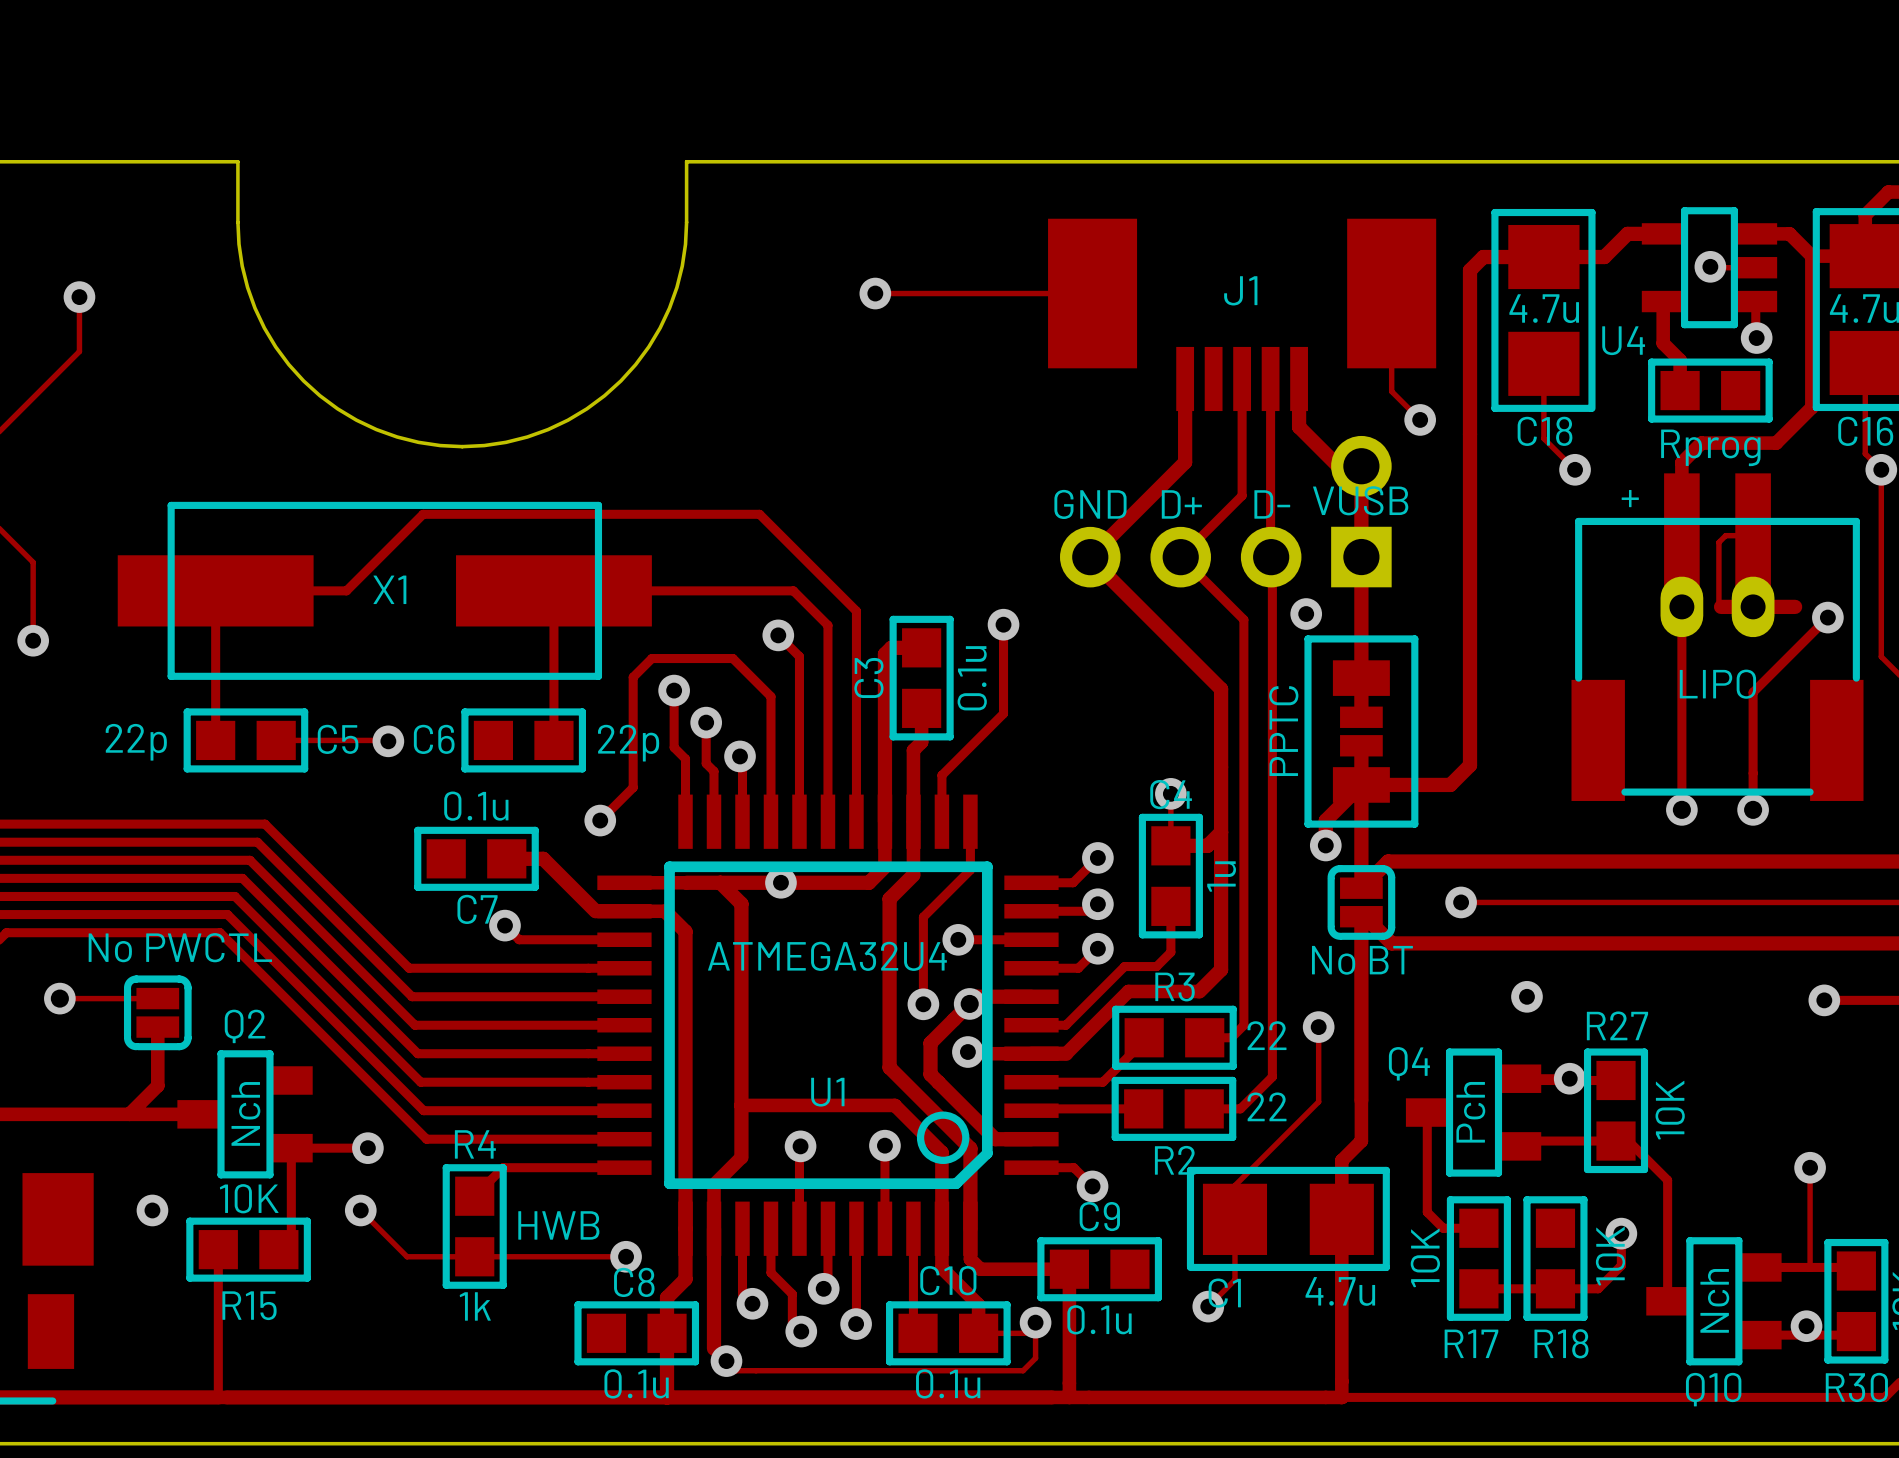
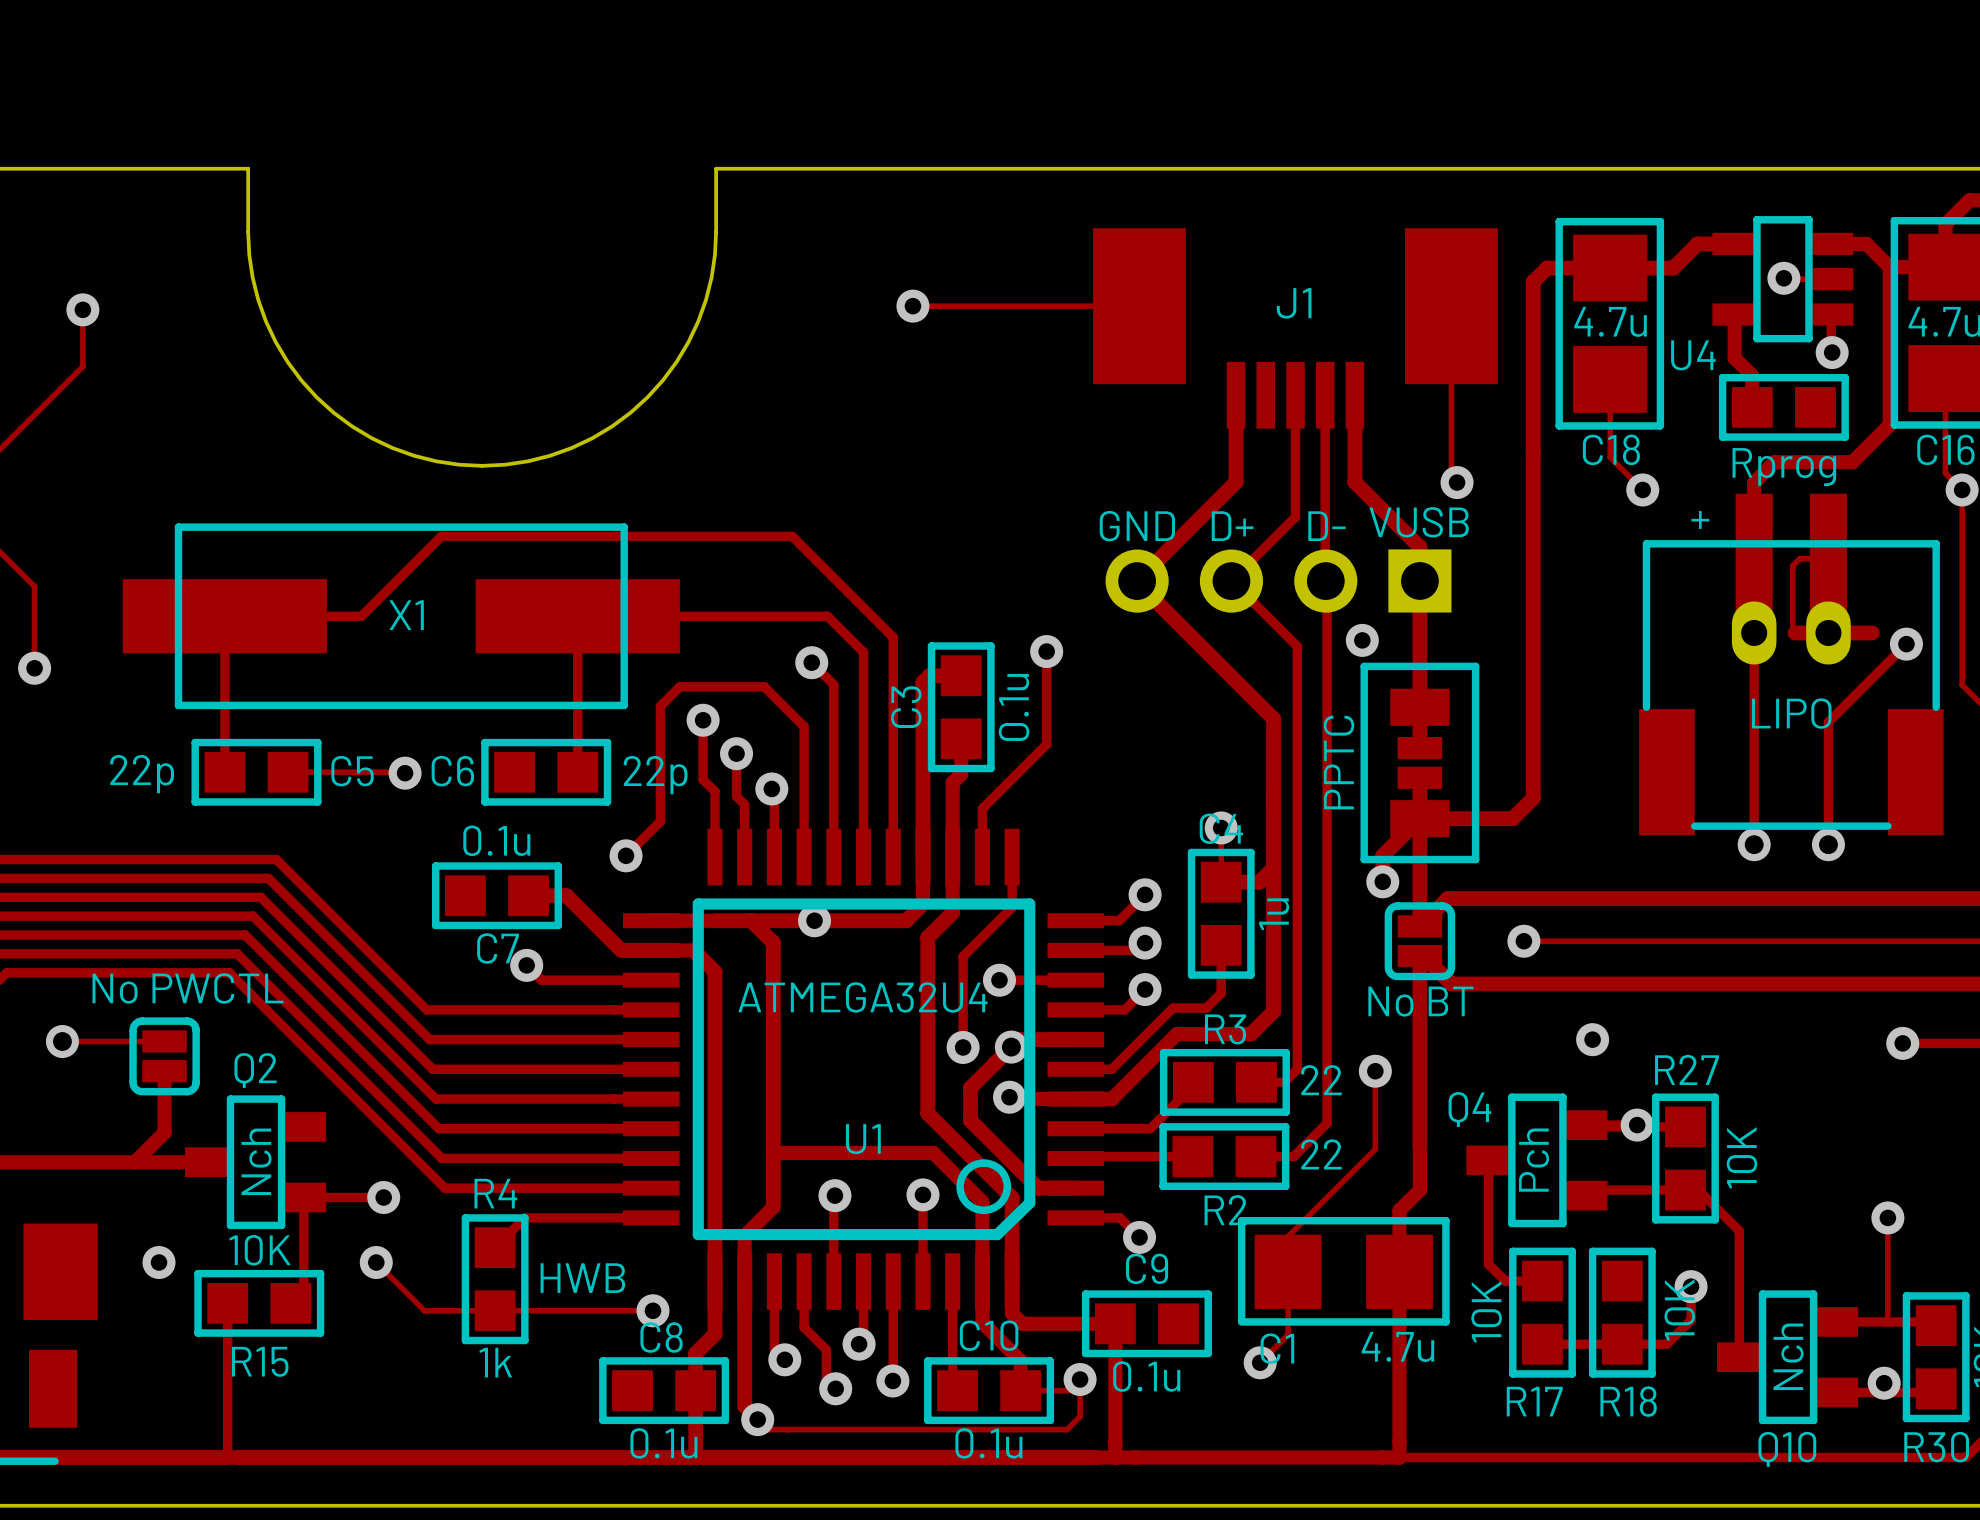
track: (1391, 391) (1420, 419) -> (1451, 408) (1451, 476) (1457, 482)
via position: (1420, 419) -> (1457, 482)
track: (1299, 427) (1338, 466) (1361, 466) (1361, 524) -> (1354, 445) (1354, 482) (1419, 547)
part: (1361, 466) -> none

